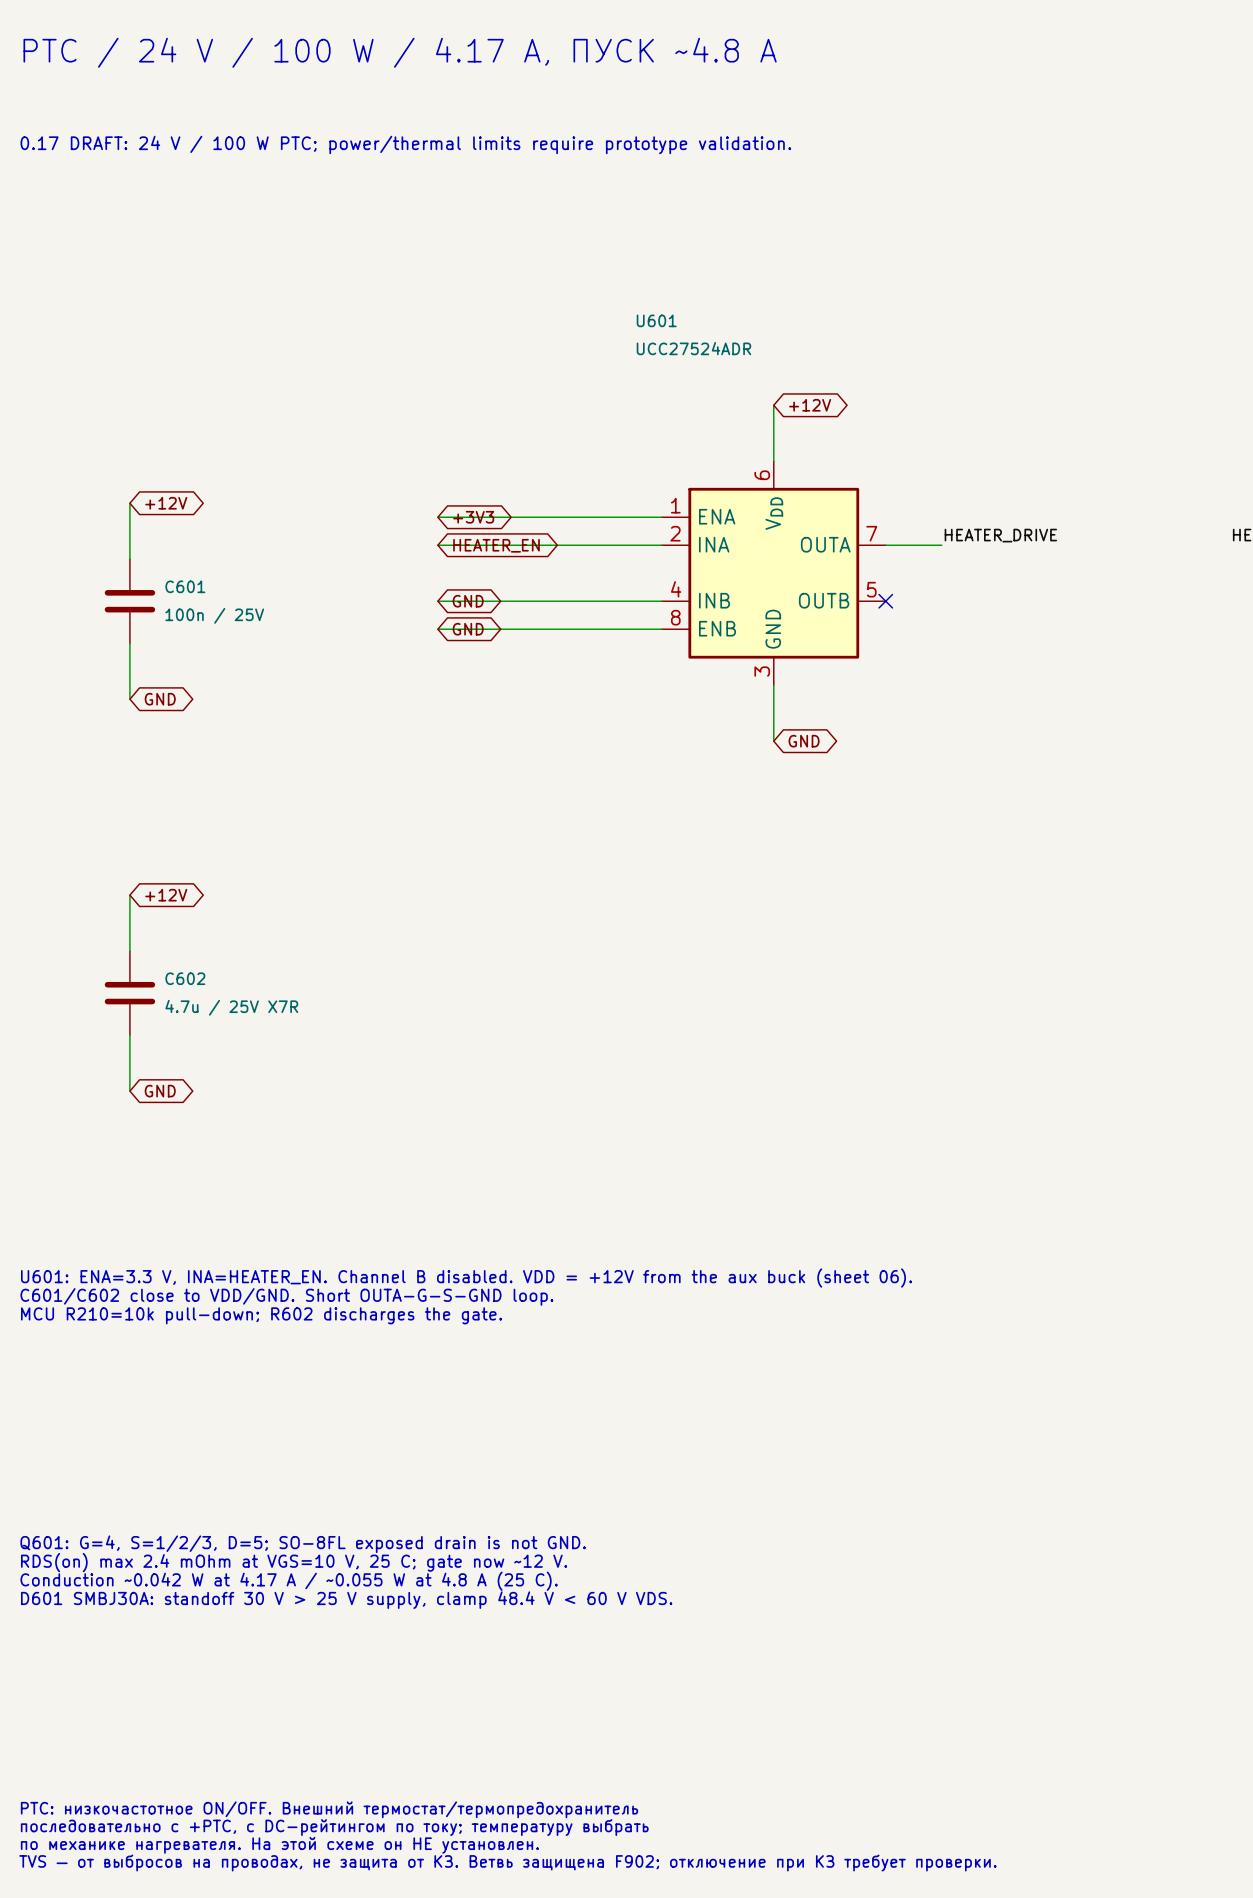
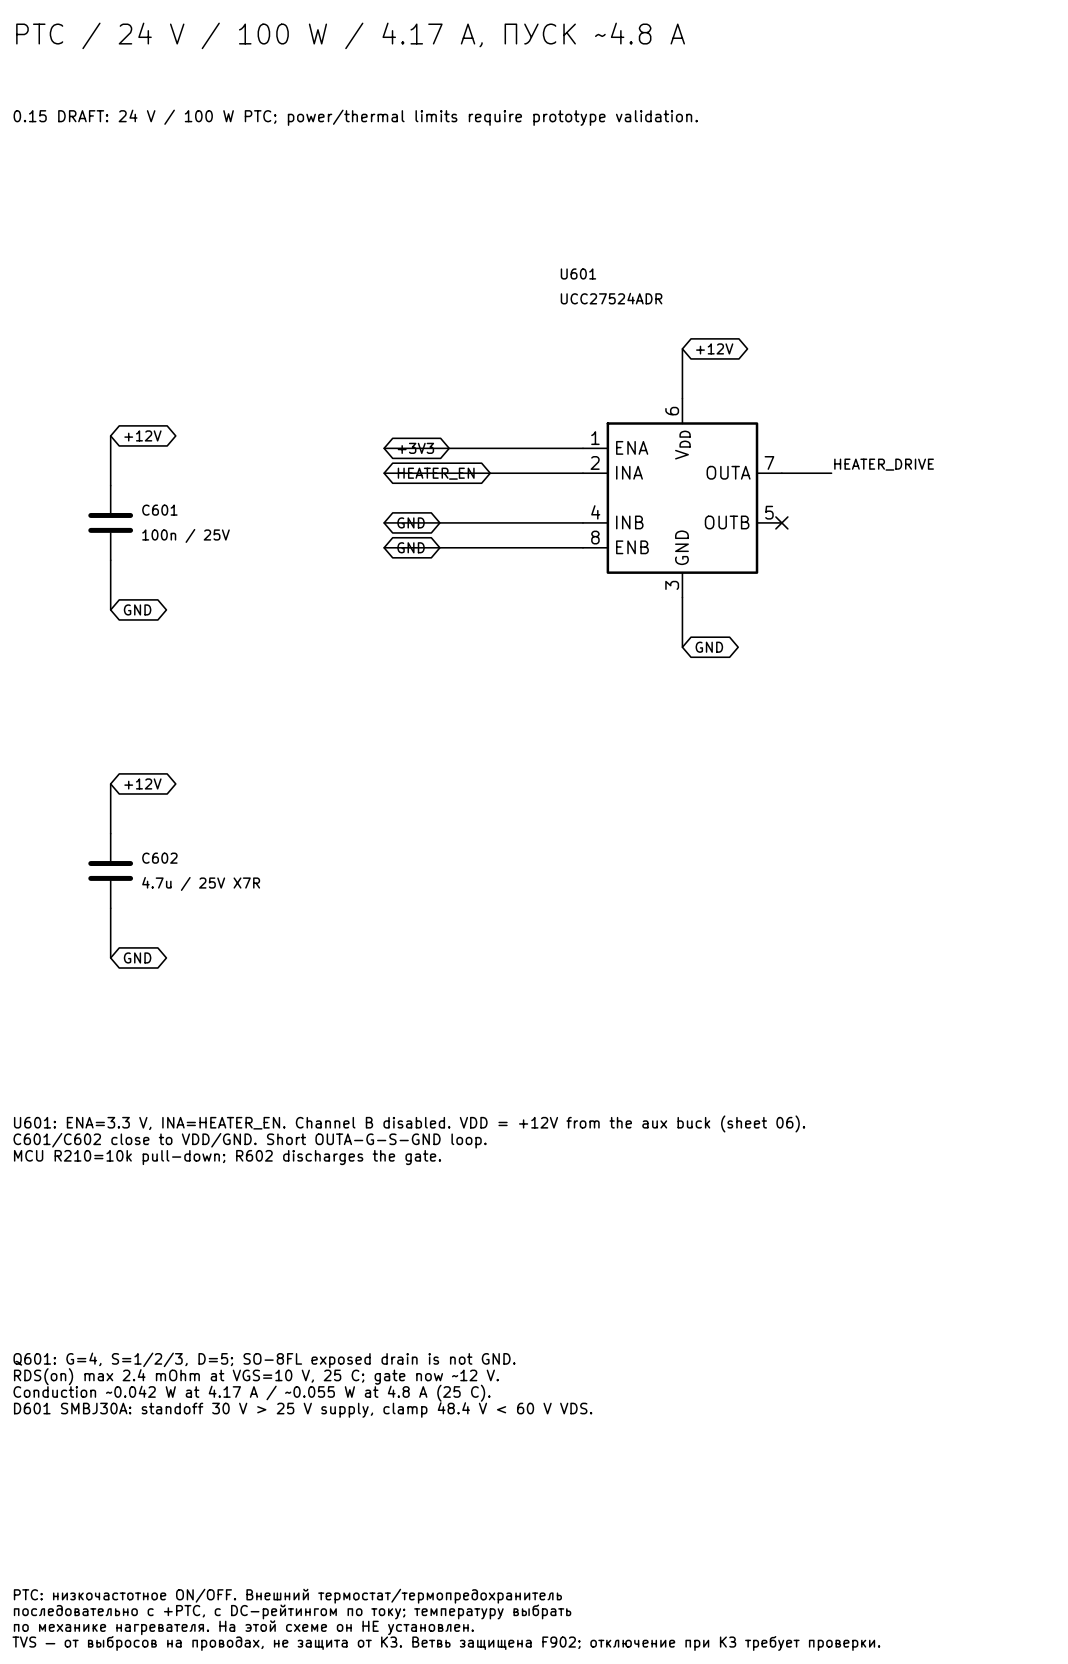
text: 0.17 DRAFT: 24 V / 100 W PTC; power/thermal limits require prototype validation. (405, 144) -> 0.15 DRAFT: 24 V / 100 W PTC; power/thermal limits require prototype validation. (355, 117)

